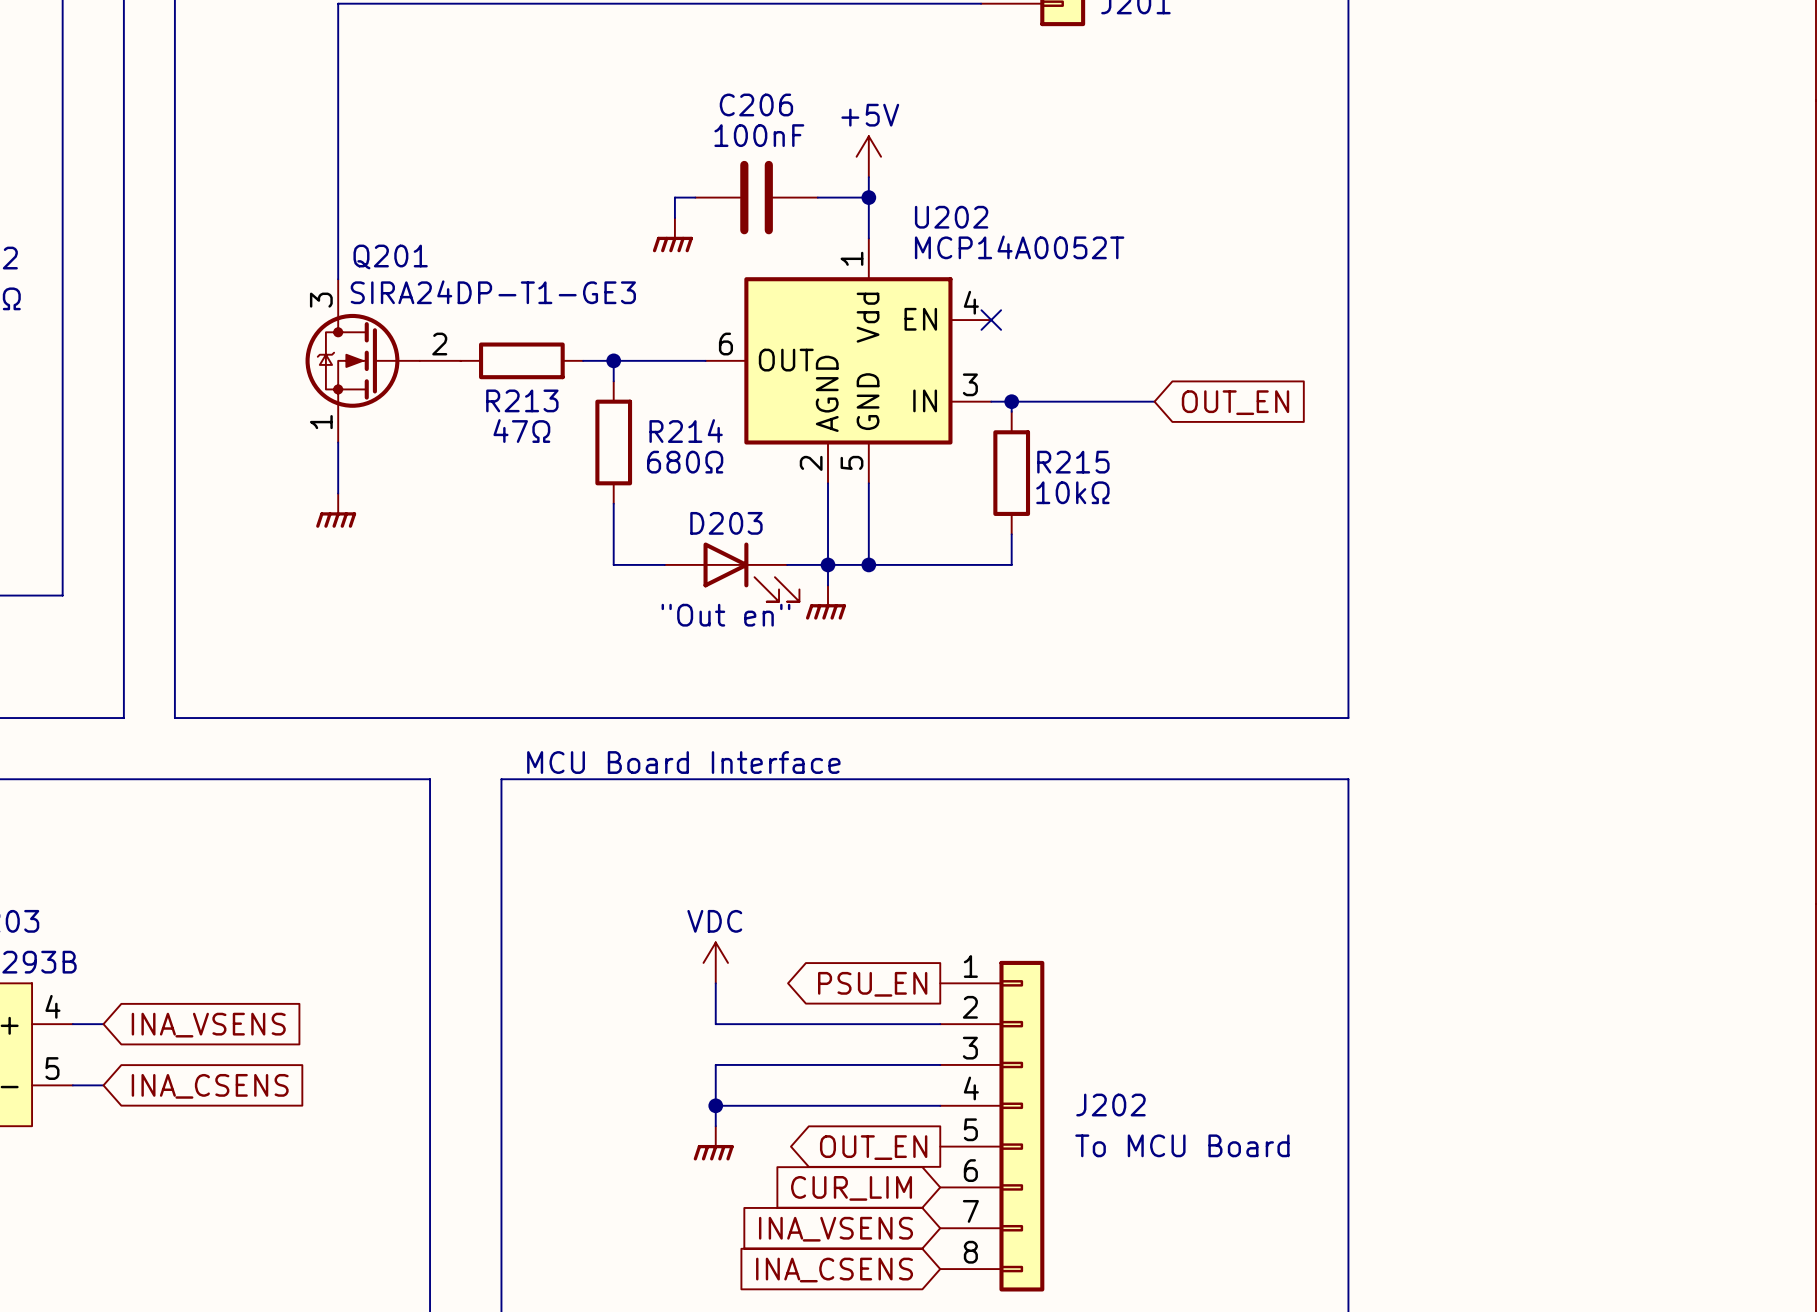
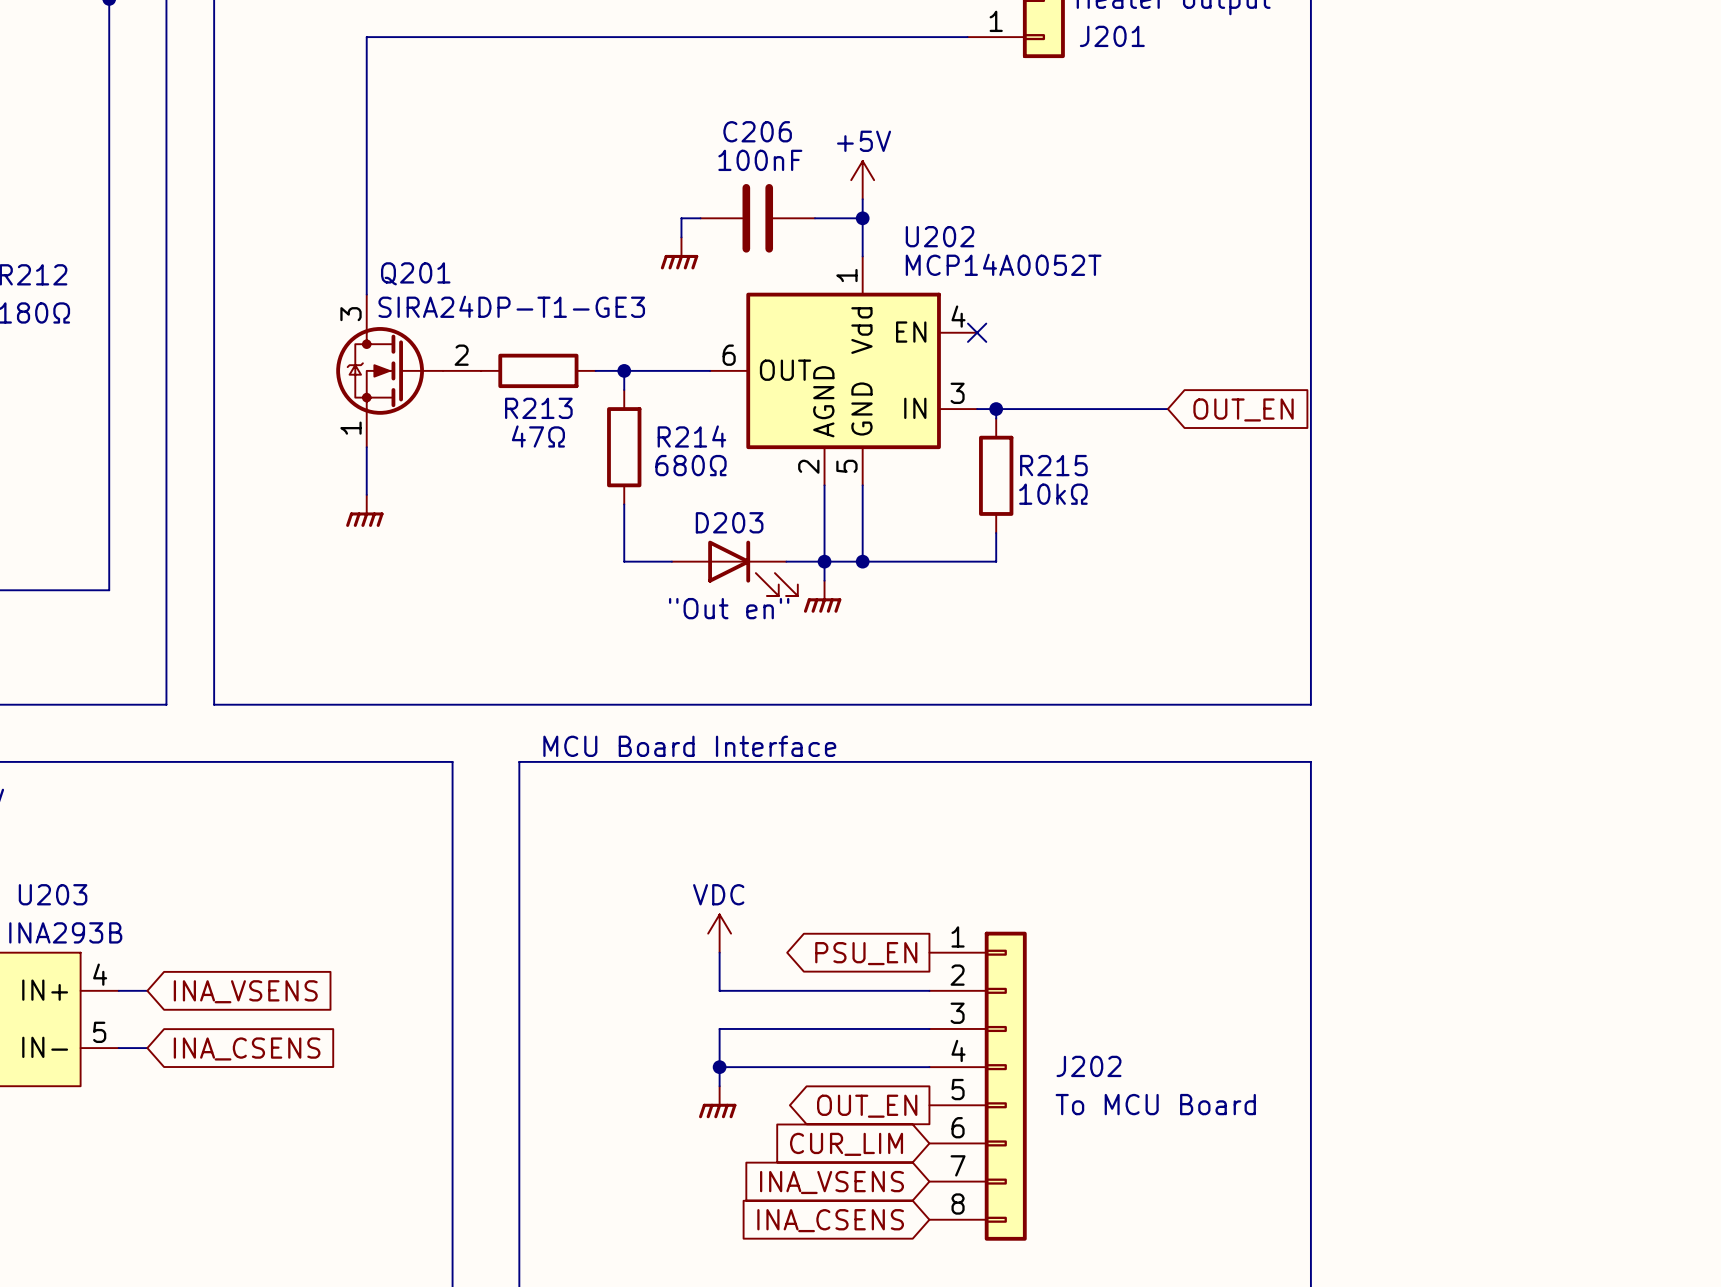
wire: none -> (1129, 409) (1167, 409)
global label position: OUT_EN (1235, 402) -> OUT_EN (1243, 409)

